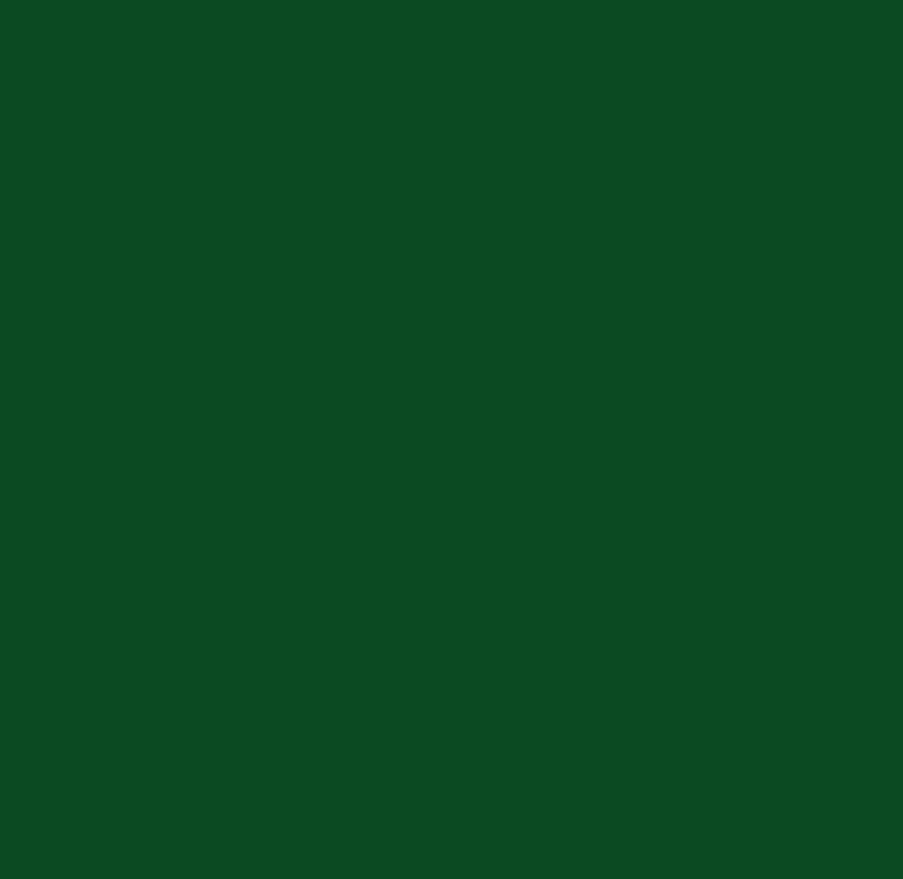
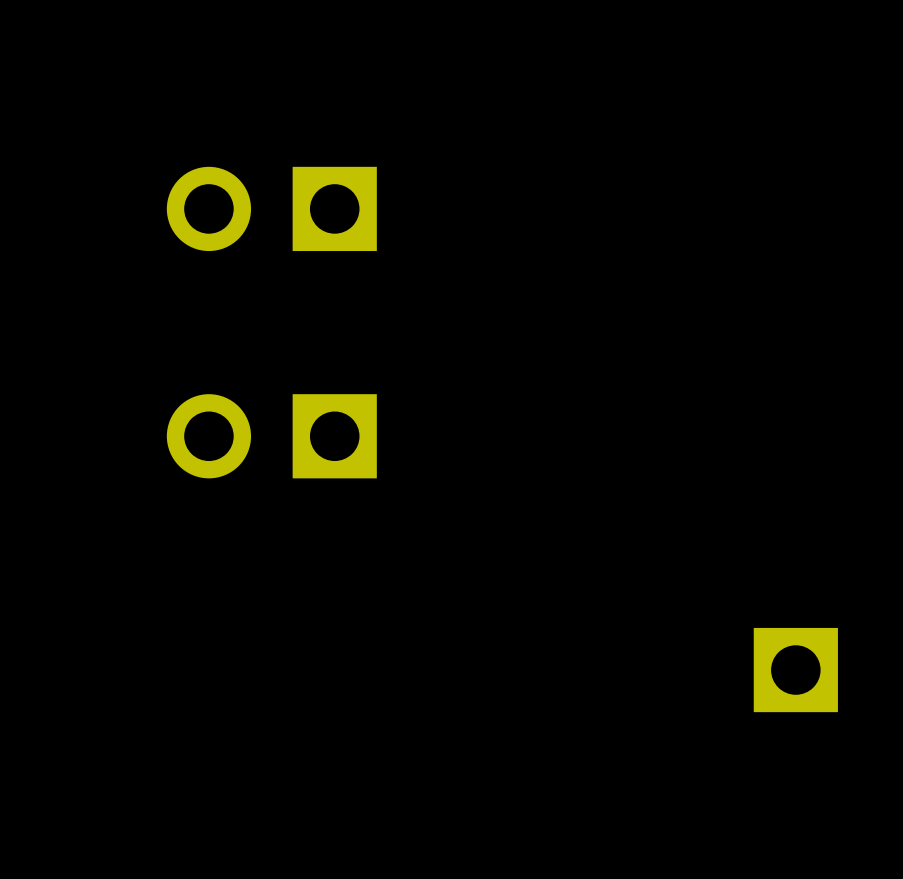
part: none -> (271, 208)
part: none -> (271, 436)
part: none -> (795, 670)

